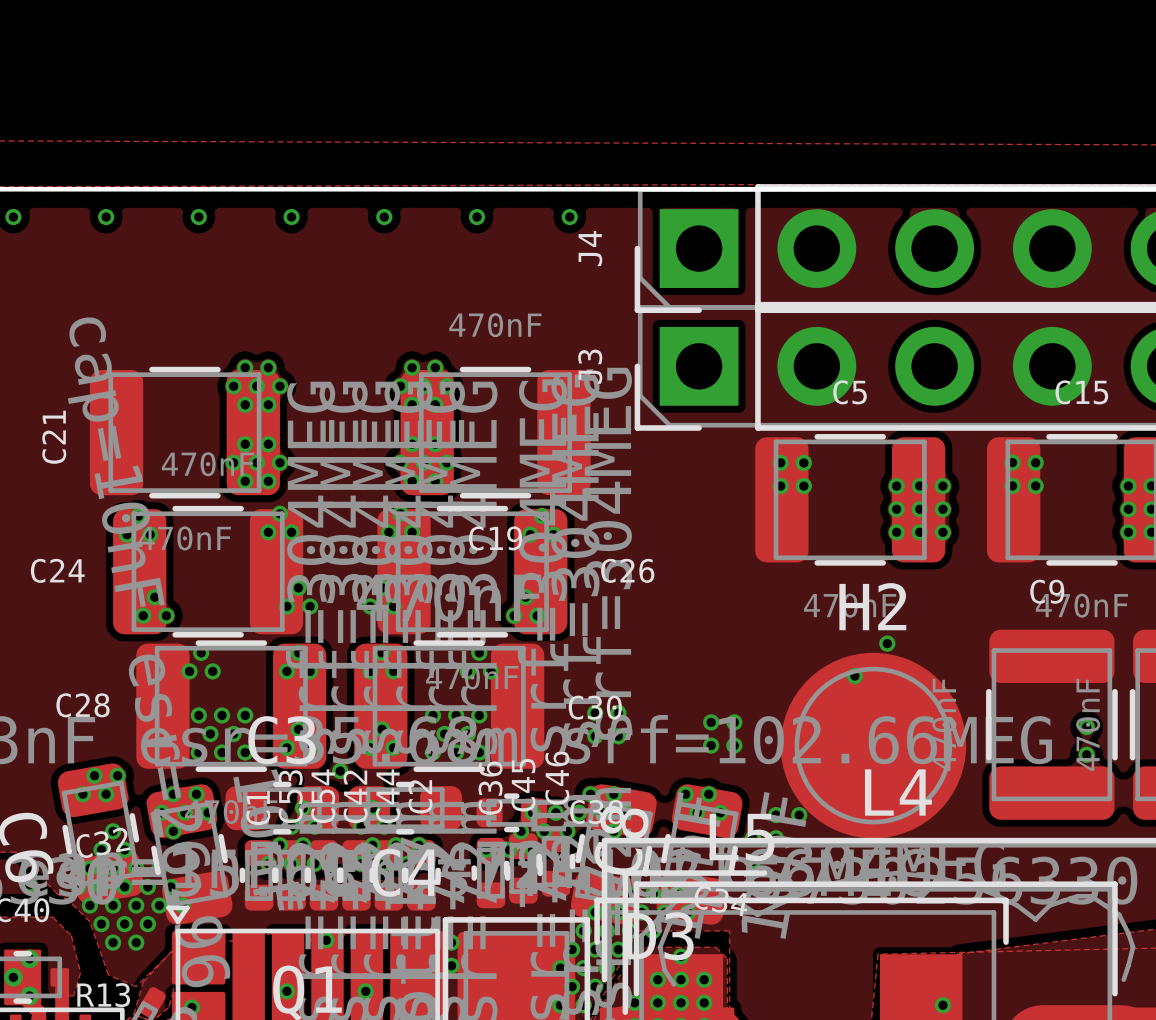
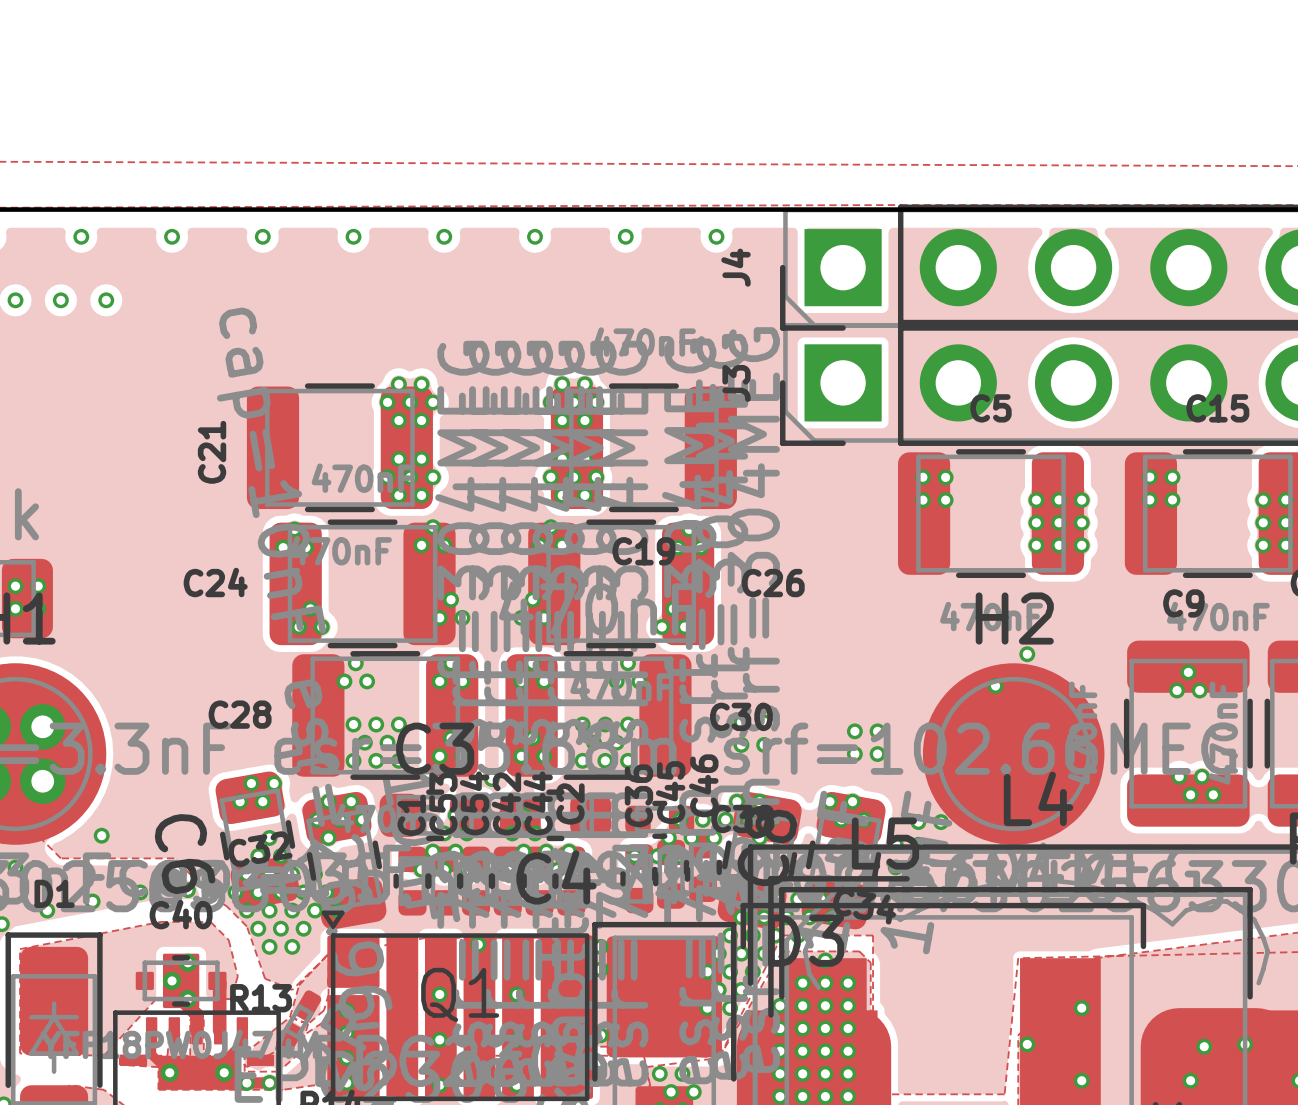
via: none -> (1188, 672)
via: none -> (1177, 690)
via: none -> (1199, 690)
via: (1086, 727) -> none
via: (1086, 754) -> none
via: none -> (1179, 776)
via: none -> (1201, 776)
via: none -> (1190, 794)
via: none -> (1213, 794)

